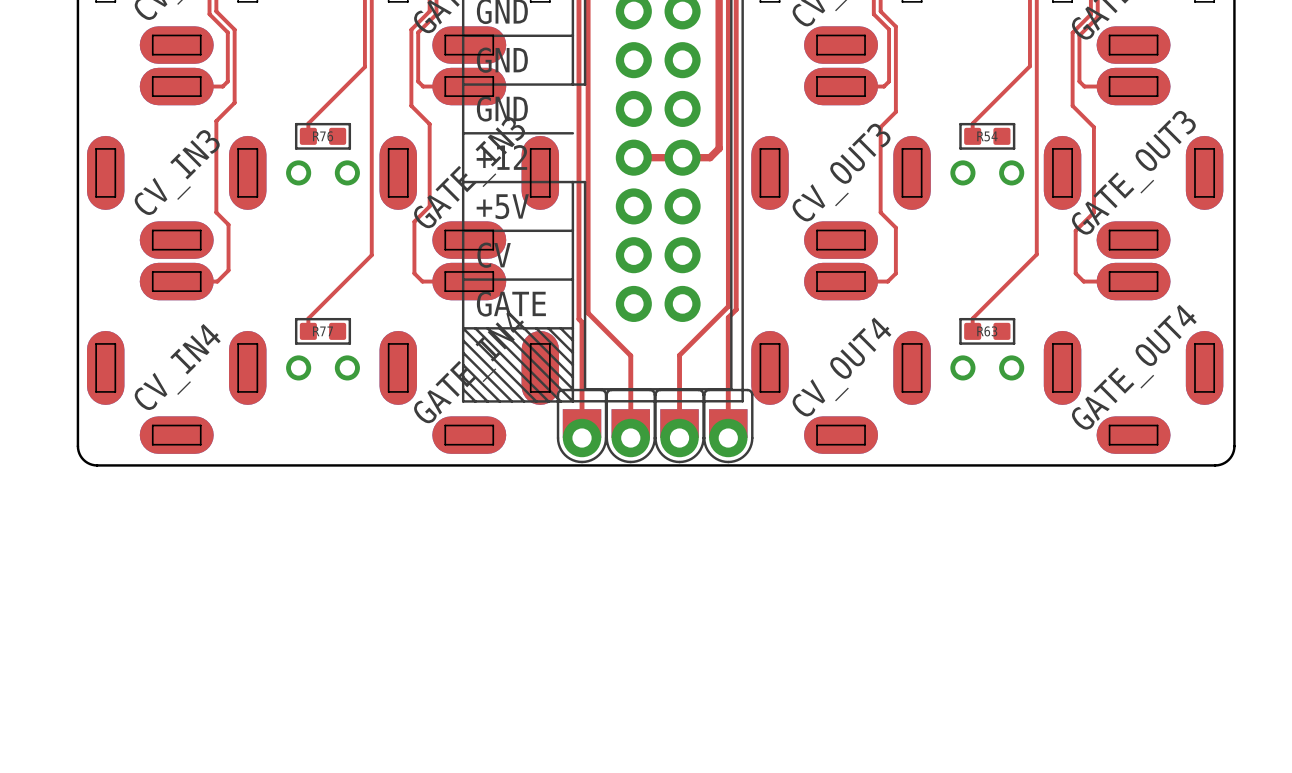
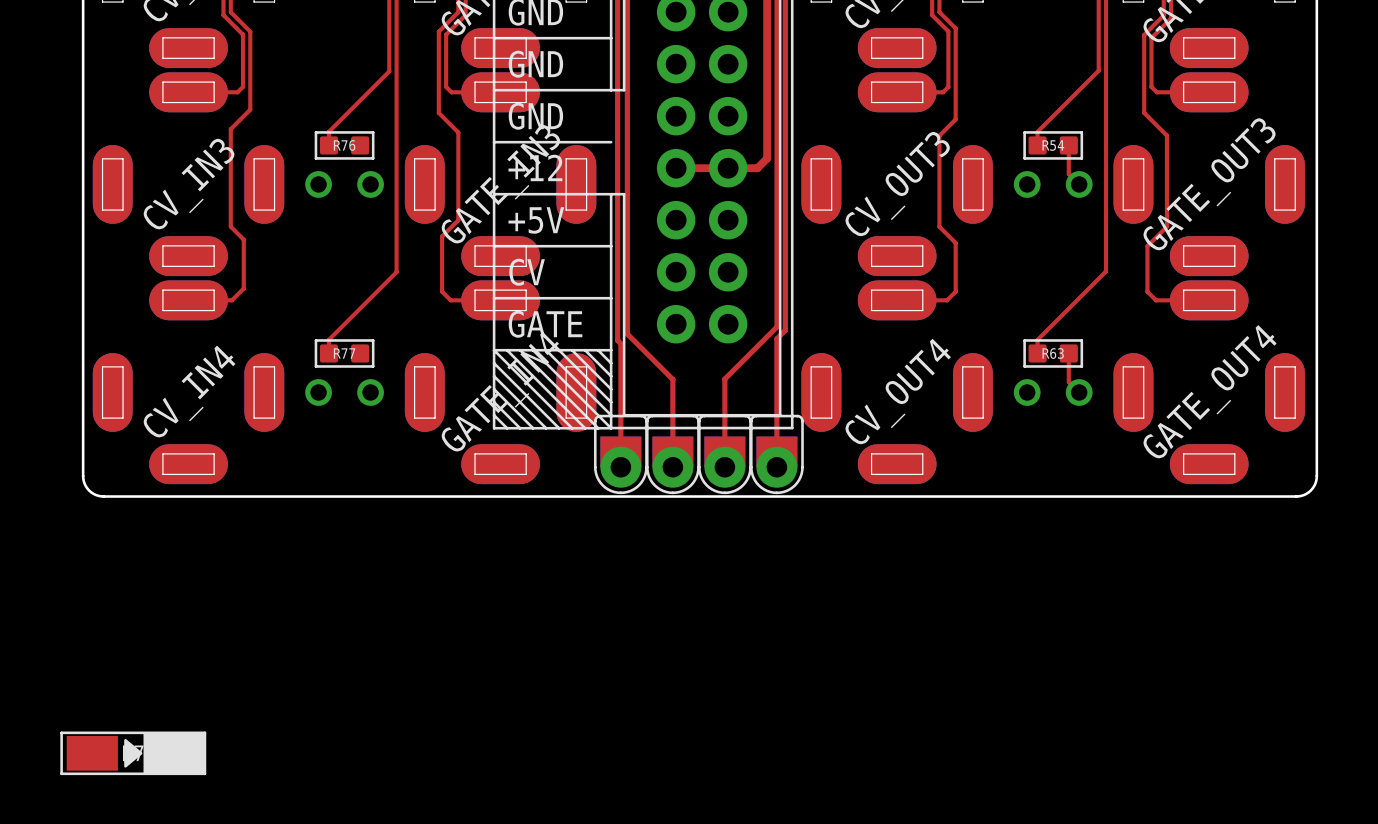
top track: none -> (1068, 145) (1068, 174) (1079, 184)
top track: none -> (1068, 353) (1068, 382) (1079, 392)
part: none -> (133, 753)

